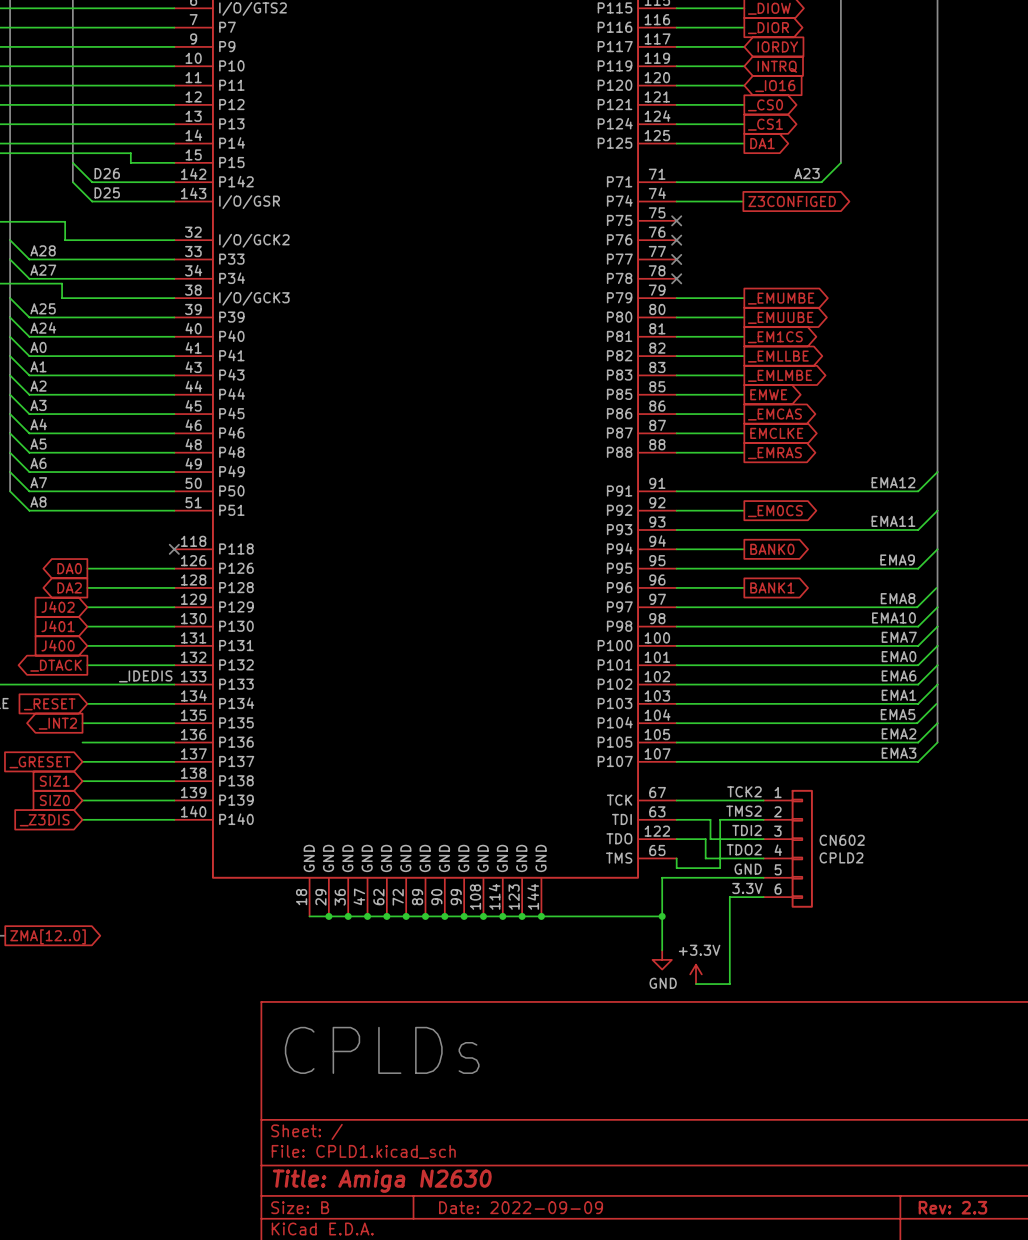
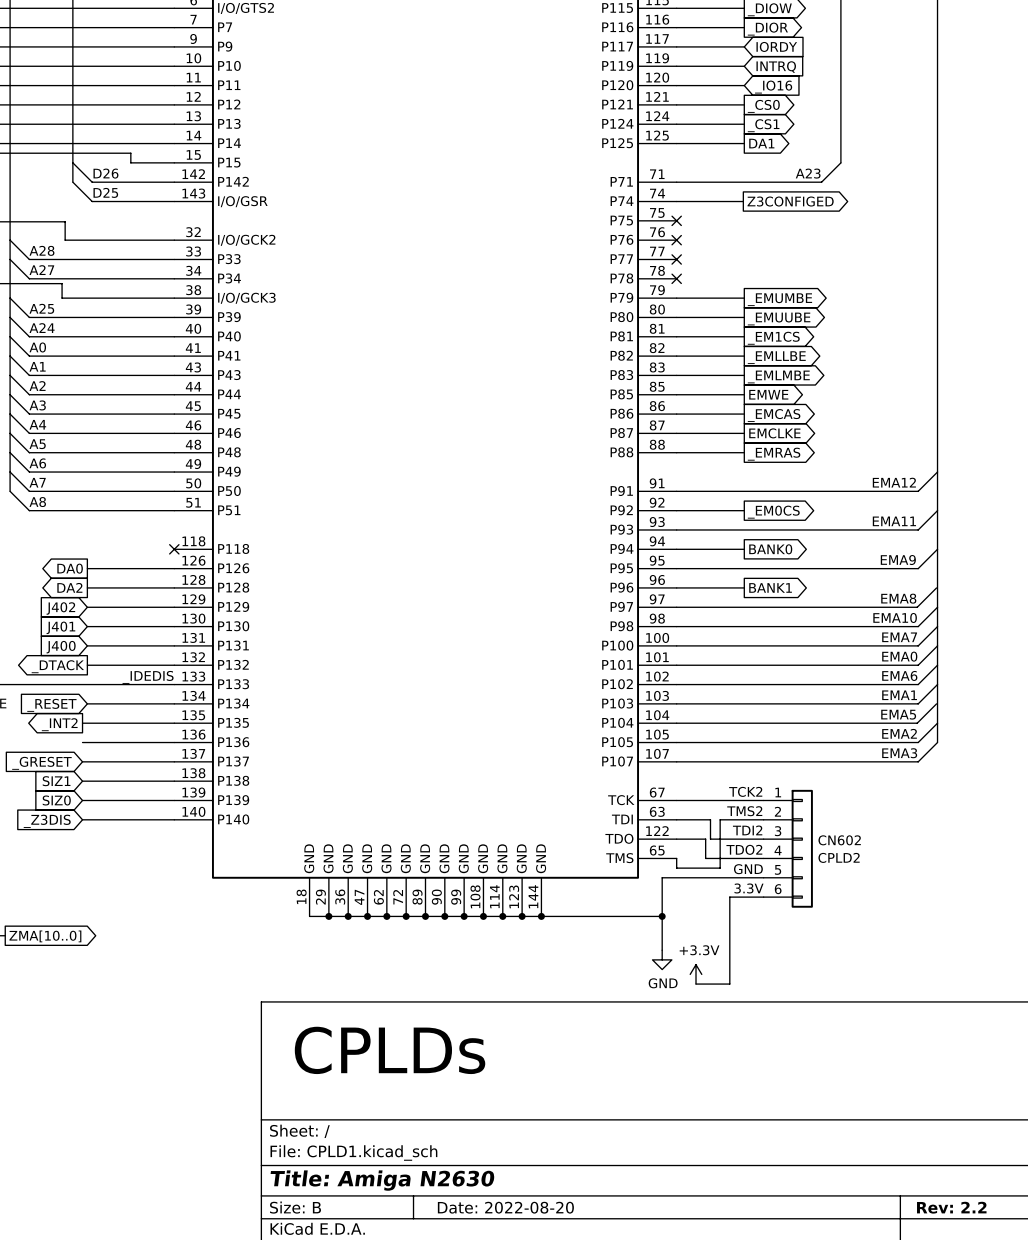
global label: ZMA[12..0] (48, 936) -> ZMA[10..0] (45, 936)
title block: Date: 2022-09-09 (521, 1207) -> Date: 2022-08-20 (505, 1207)
title block: Rev: 2.3 (952, 1207) -> Rev: 2.2 (951, 1207)

